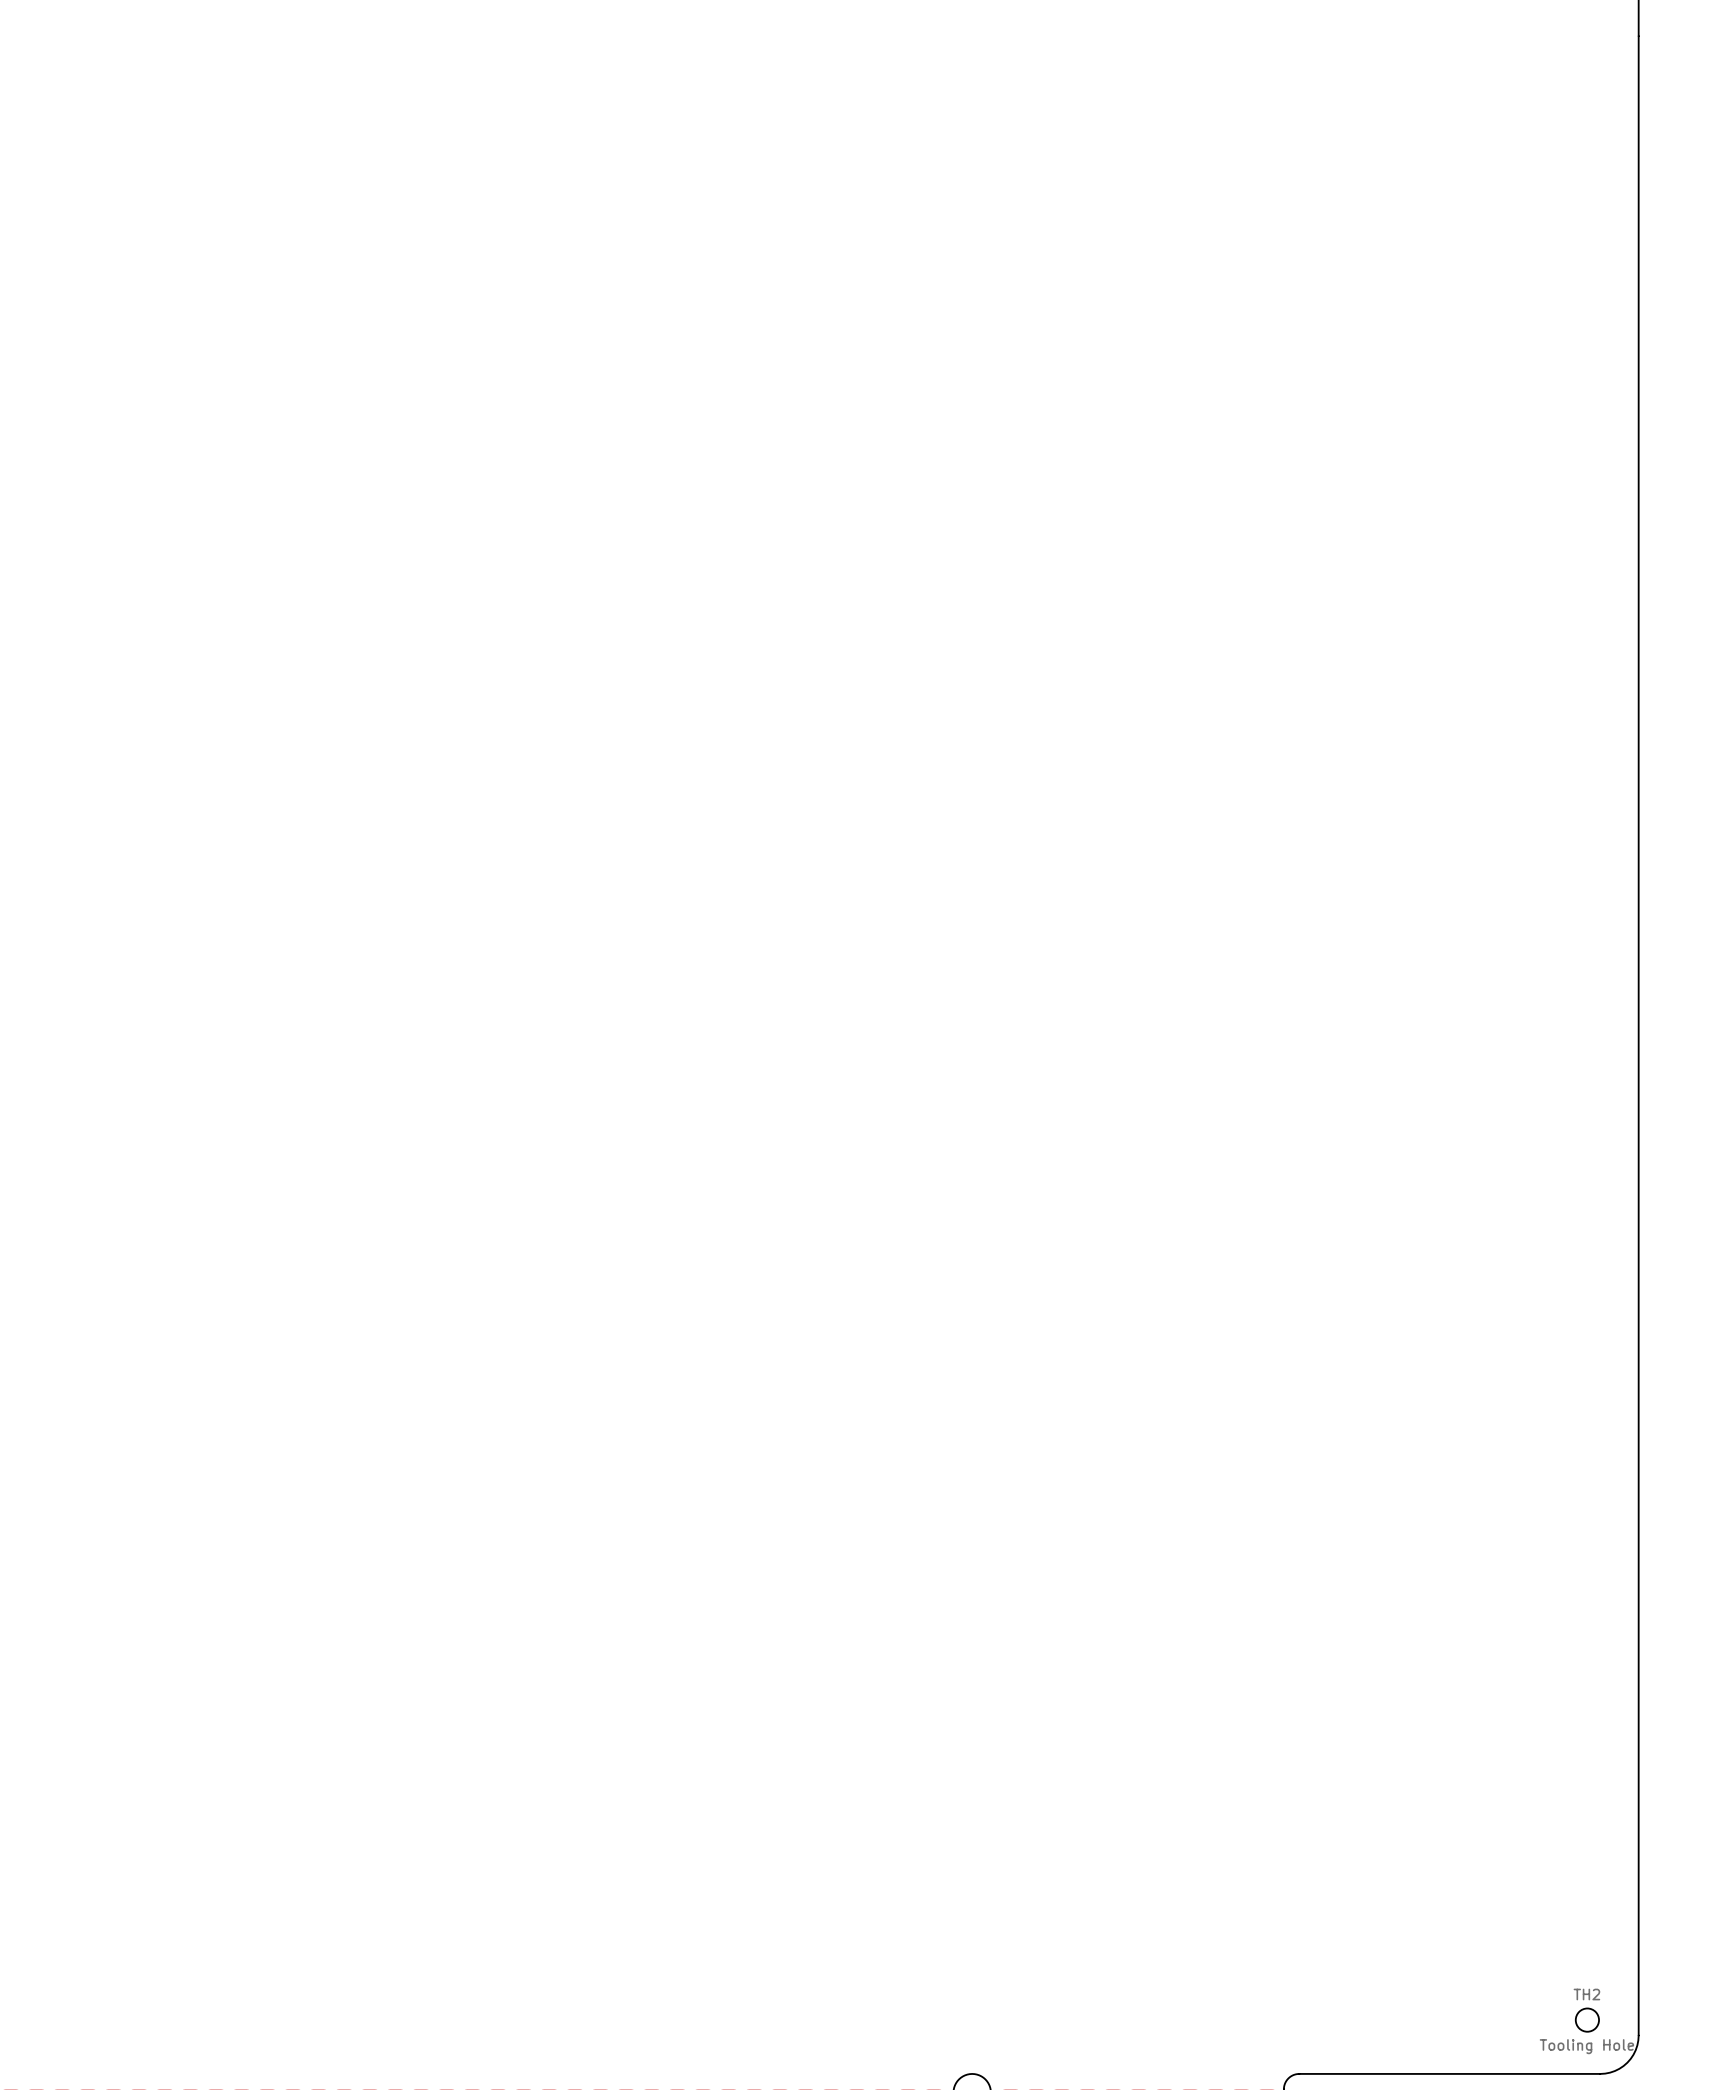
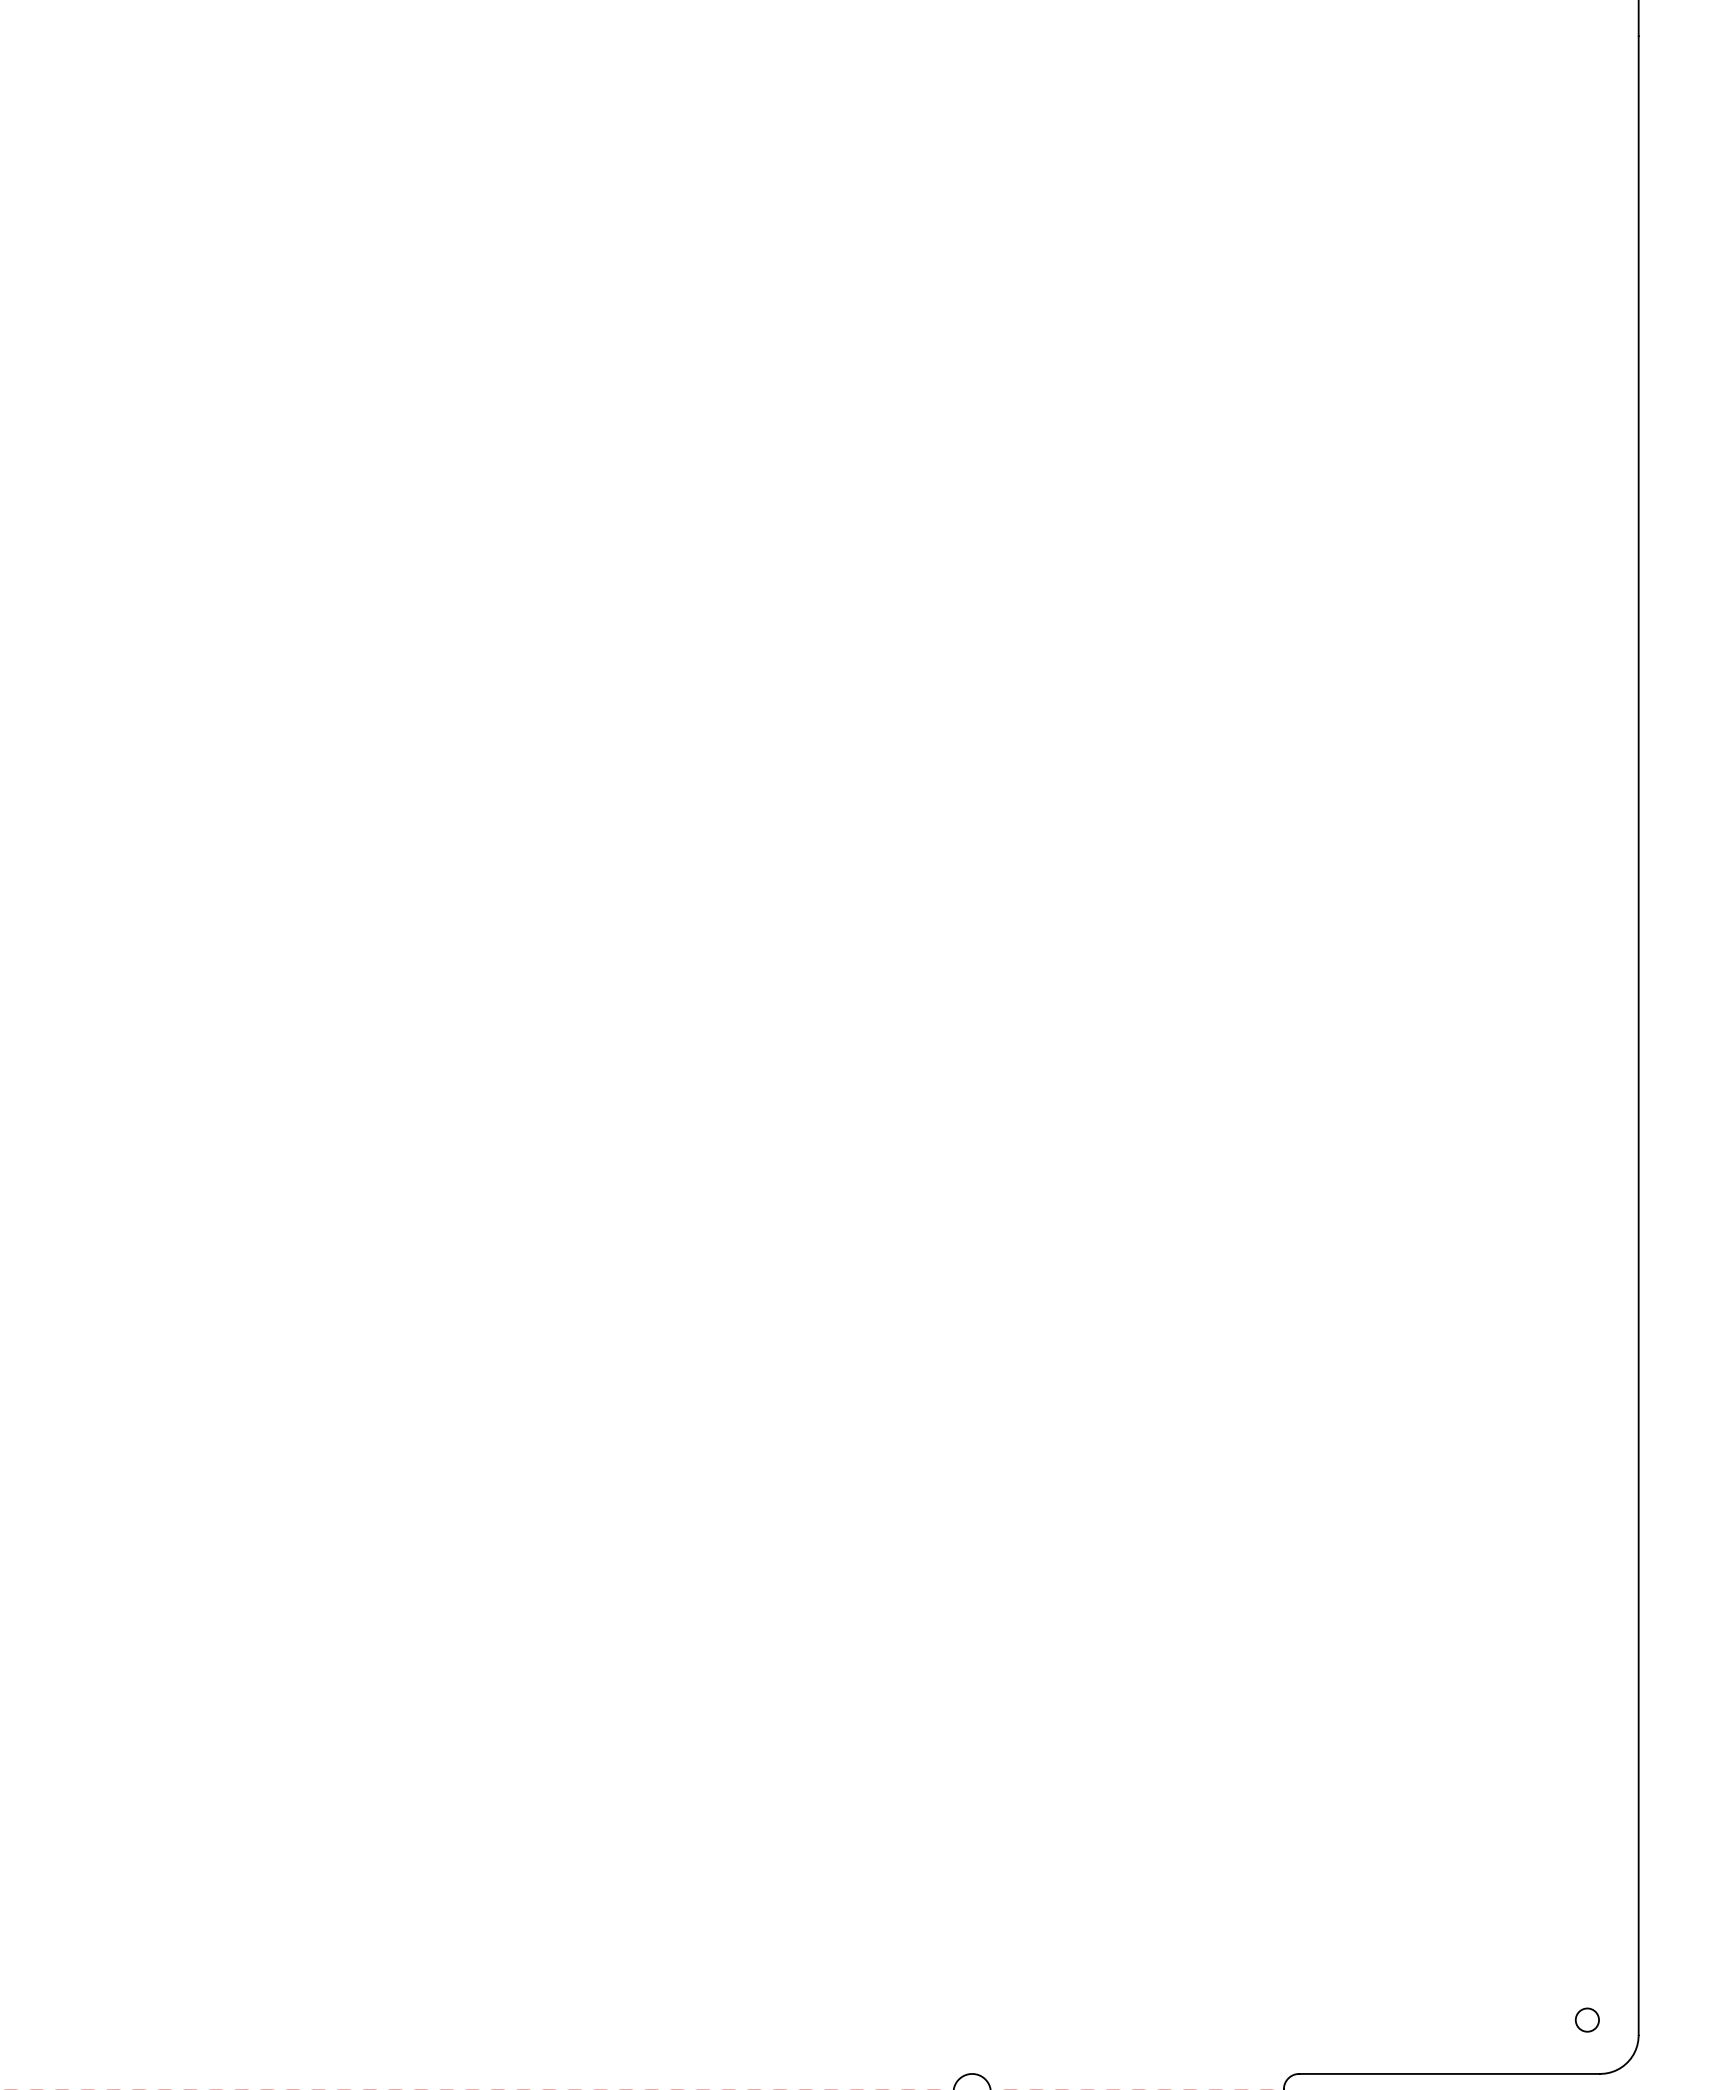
TH2 name: TH2 (1586, 1994) -> none
TH2 value: Tooling Hole (1586, 2046) -> none

